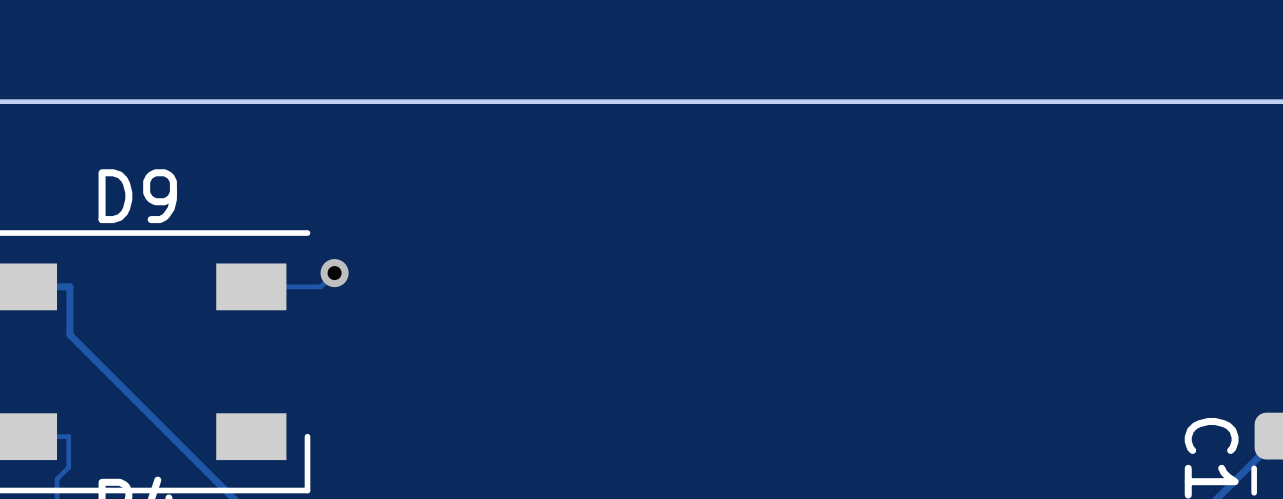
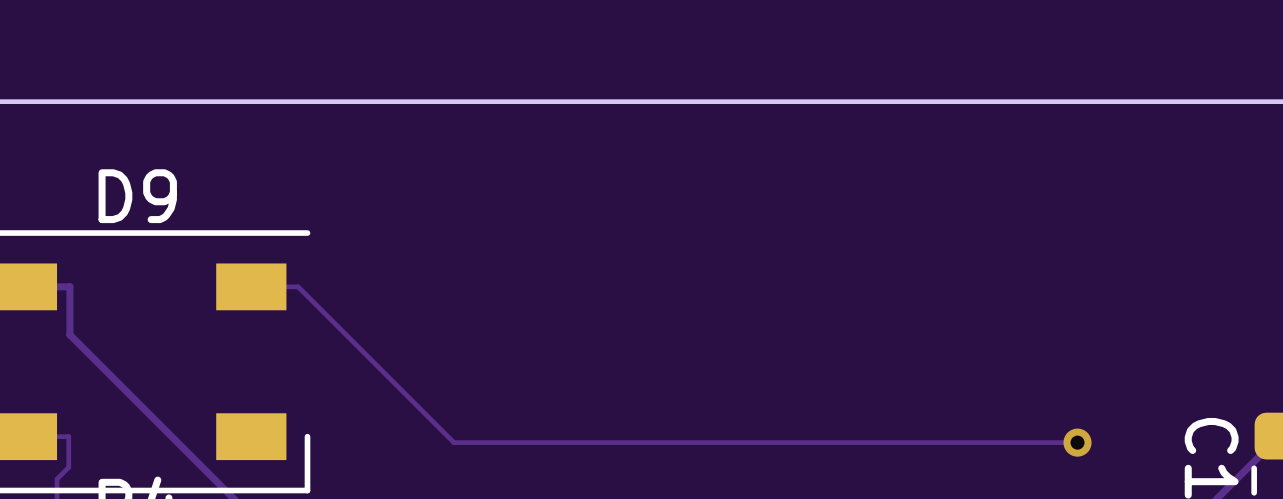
track: (334, 273) (320, 286) (298, 286) -> (1077, 442) (453, 442) (298, 286)
via: (334, 273) -> none
via: none -> (1077, 442)

